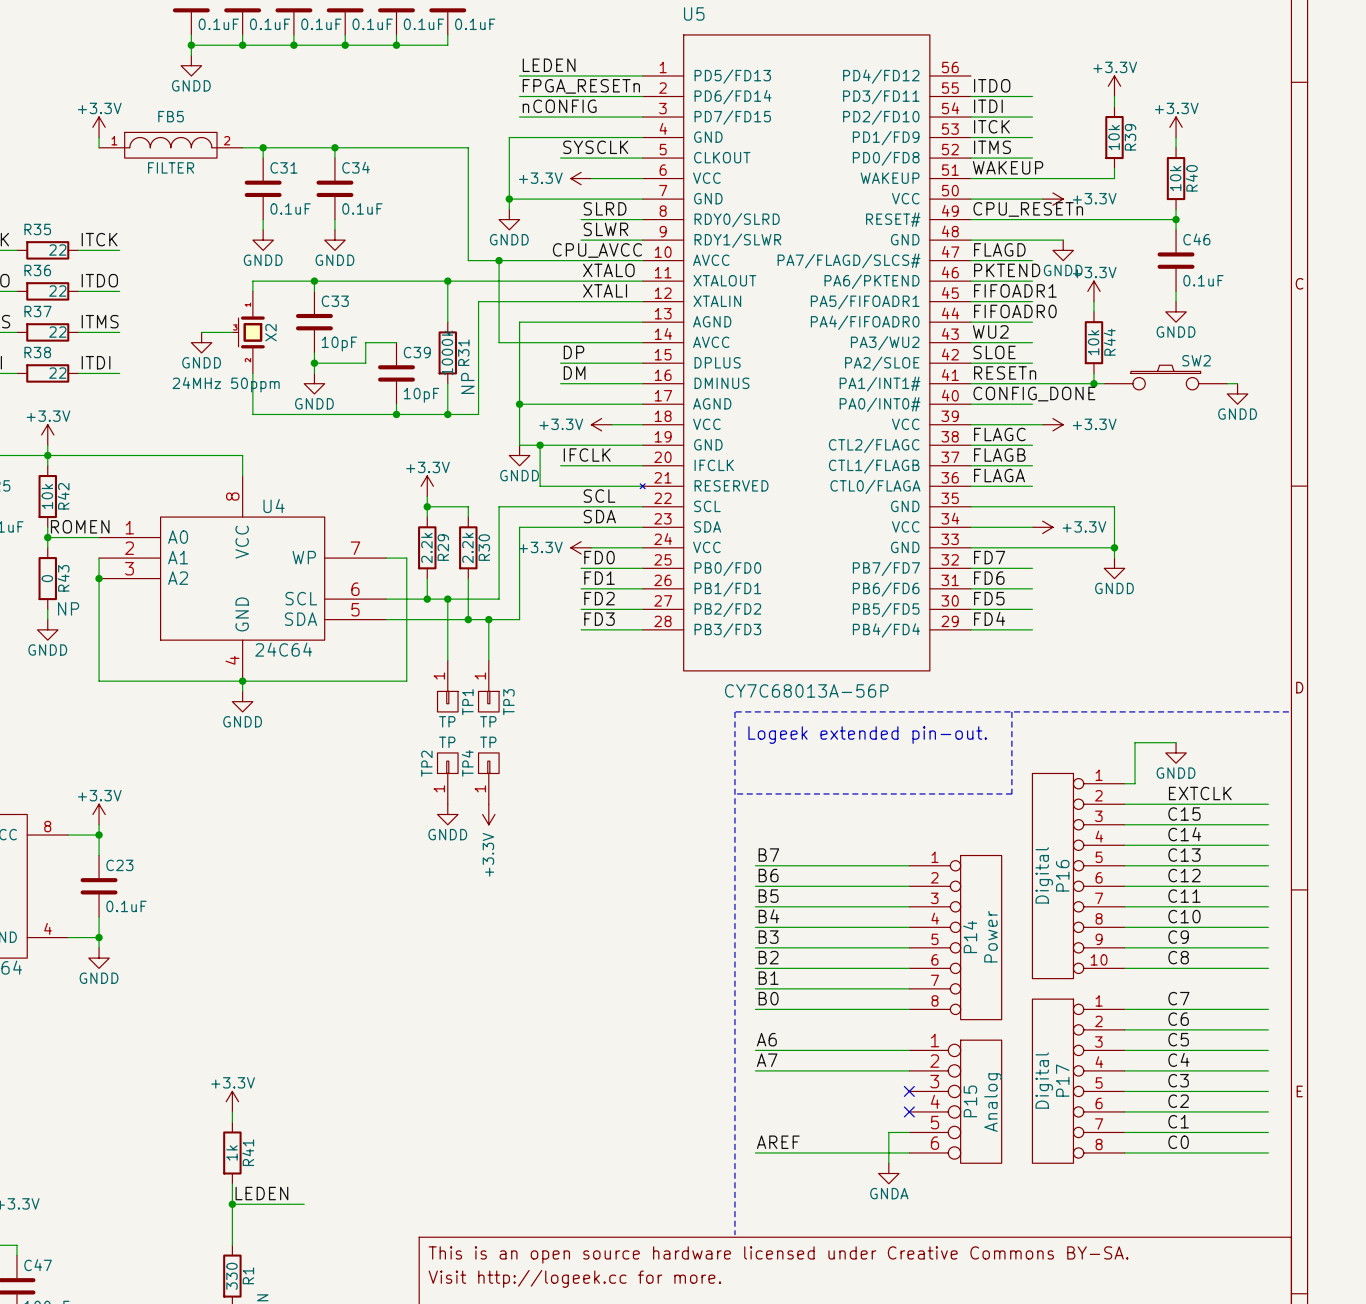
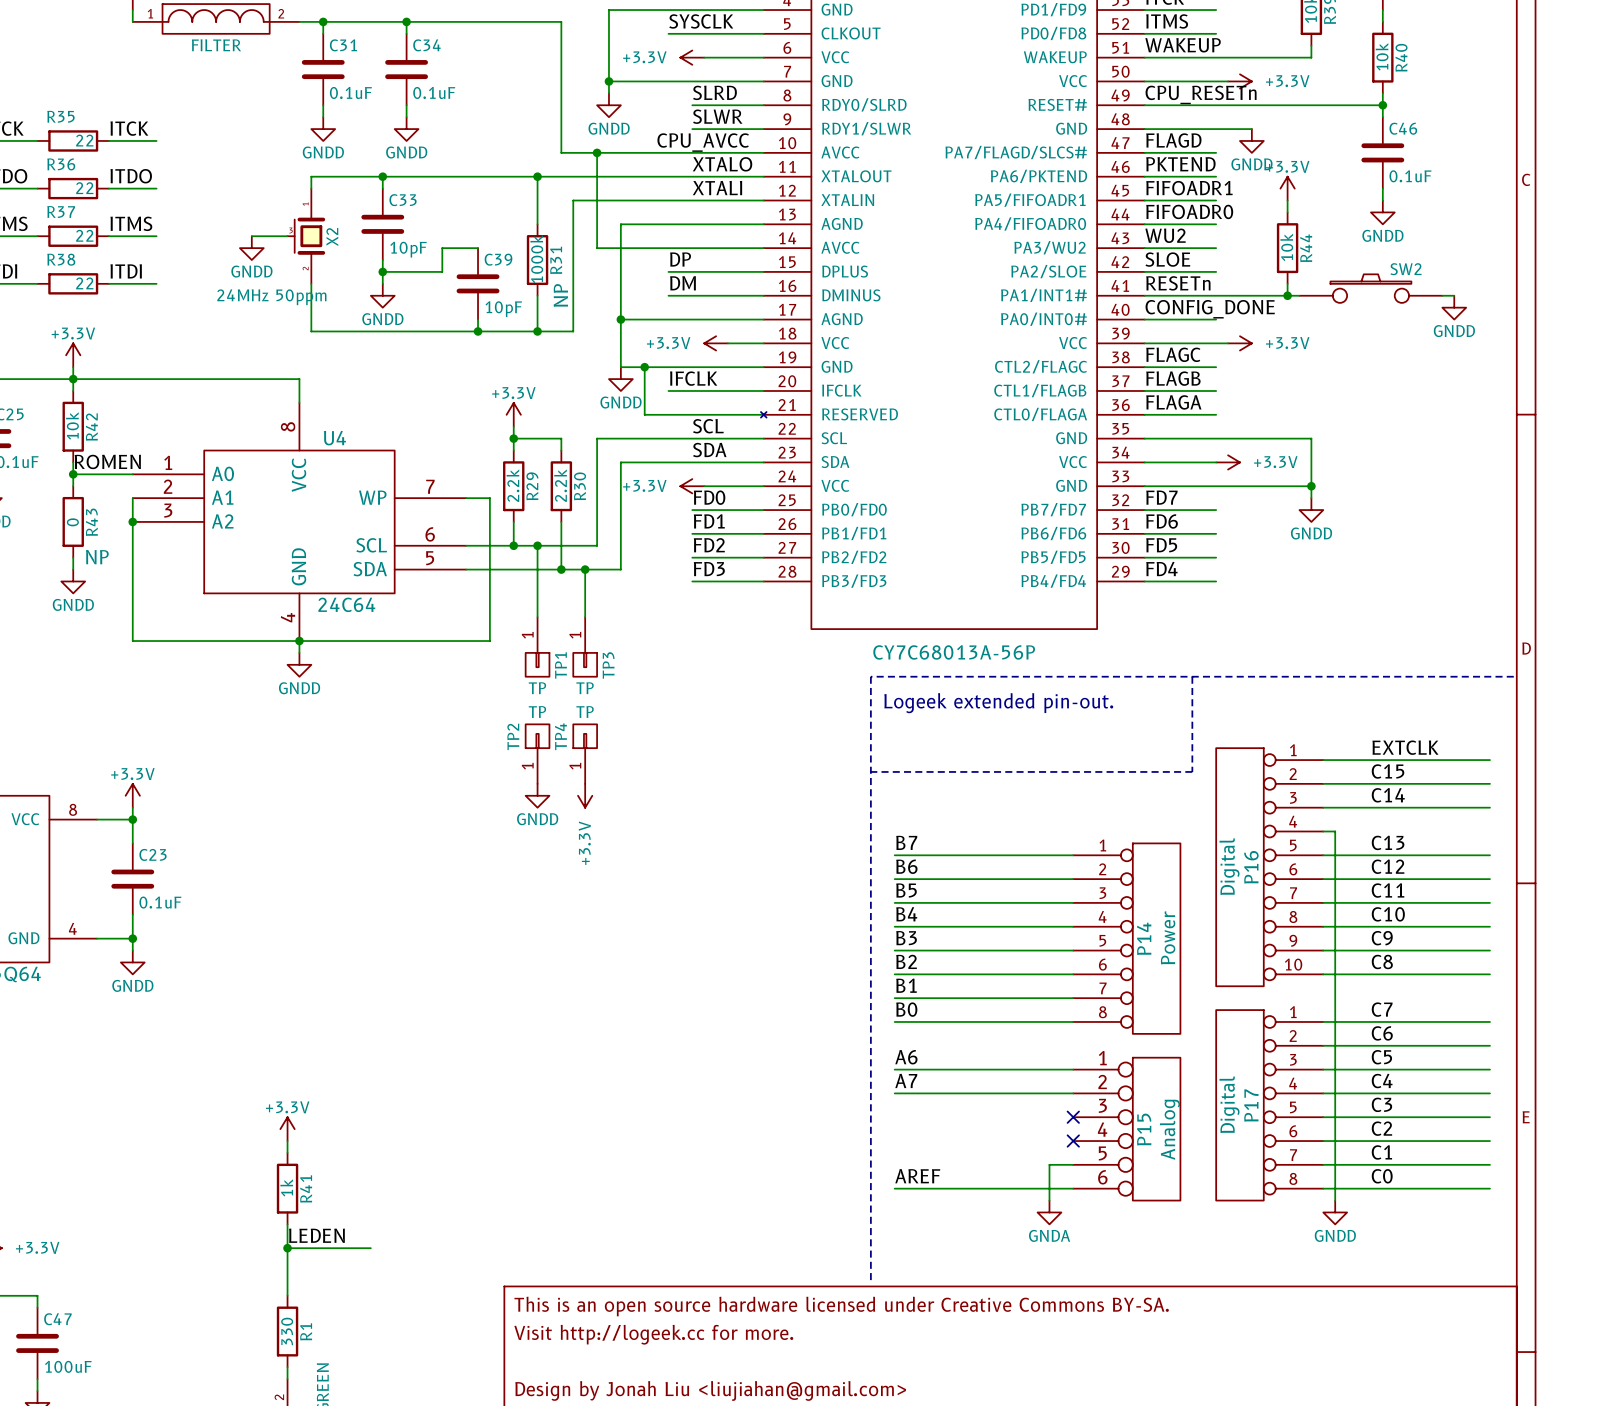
wire: (1176, 742) (1135, 742) (1135, 783) -> (1489, 760) (1335, 760)
power symbol: GNDD (1176, 752) -> none
label: none -> EXTCLK (1405, 747)
label: EXTCLK (1200, 793) -> C15 (1388, 771)
label: C15 (1184, 814) -> C14 (1388, 795)
label: C14 (1184, 834) -> none
wire: (1135, 845) (1268, 845) -> (1335, 831) (1335, 1200)
power symbol: none -> GNDD (1335, 1212)

